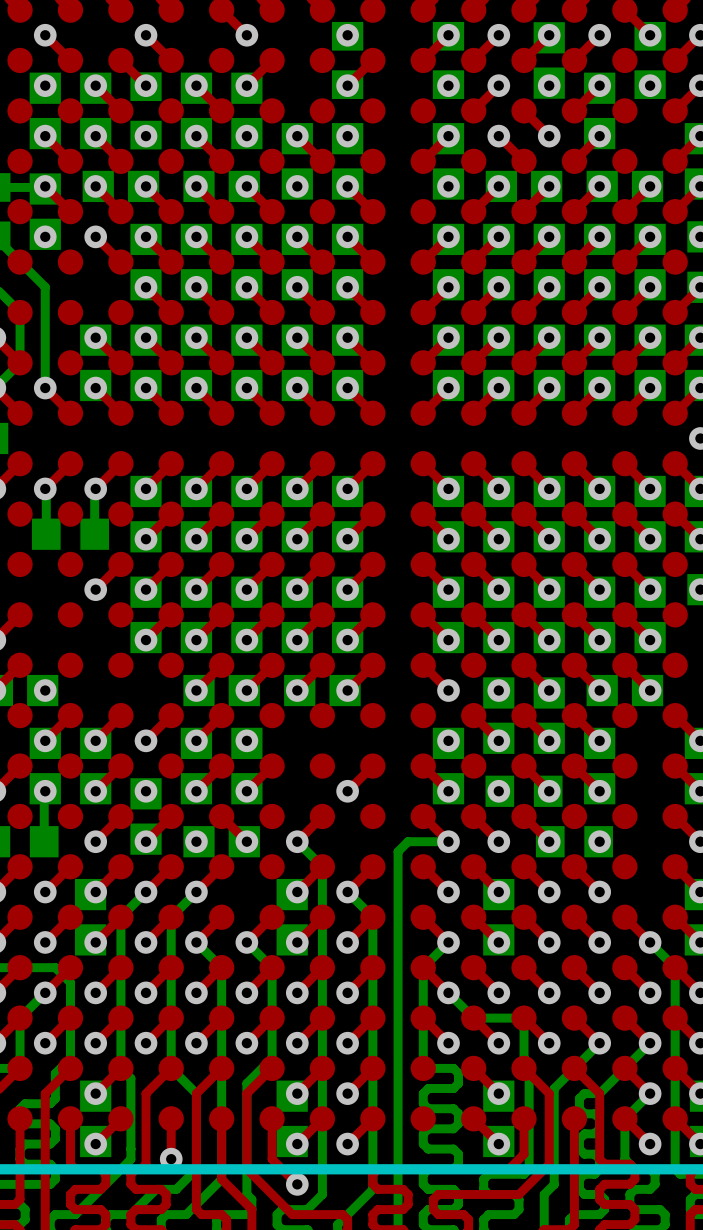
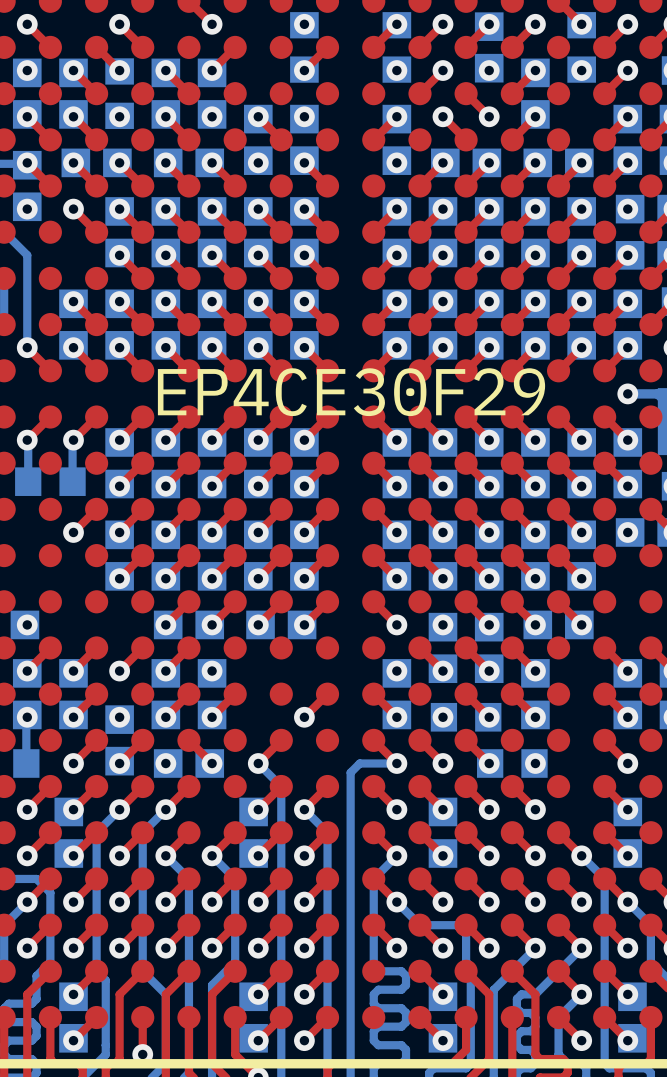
part value: none -> EP4CE30F29 (351, 392)

